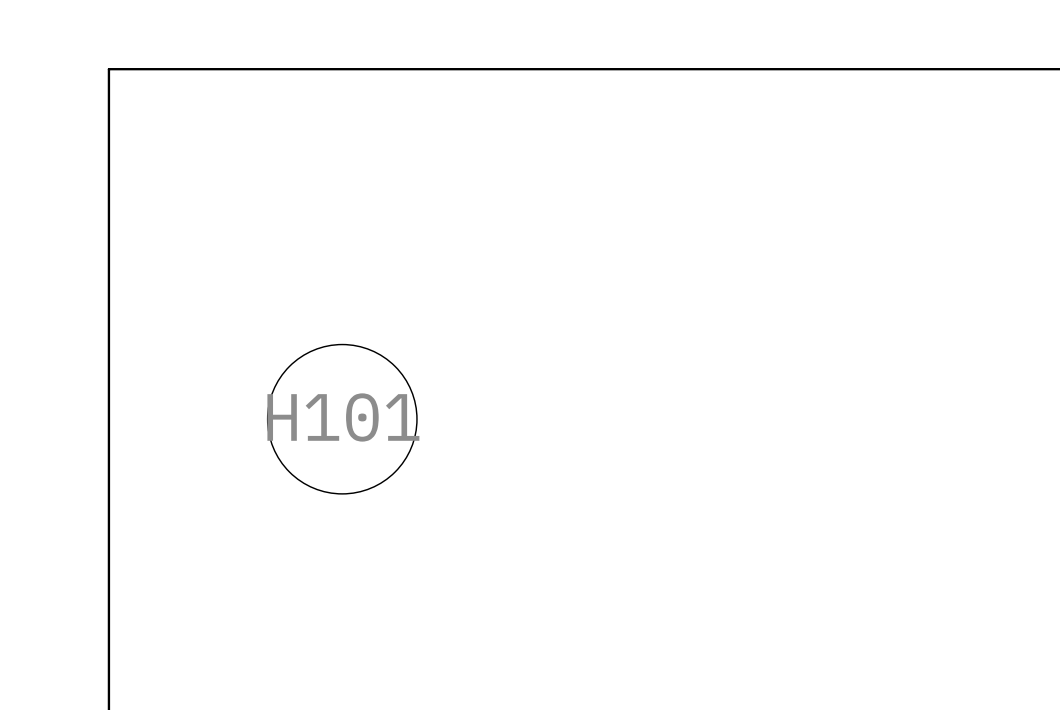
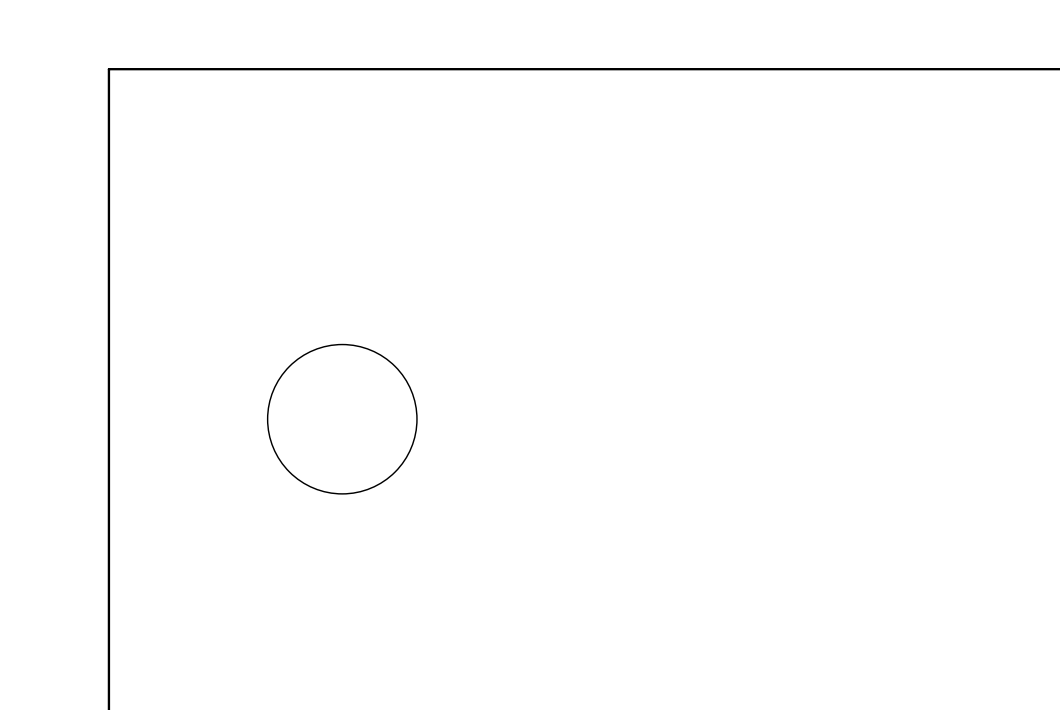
H101 name: H101 (343, 417) -> none

